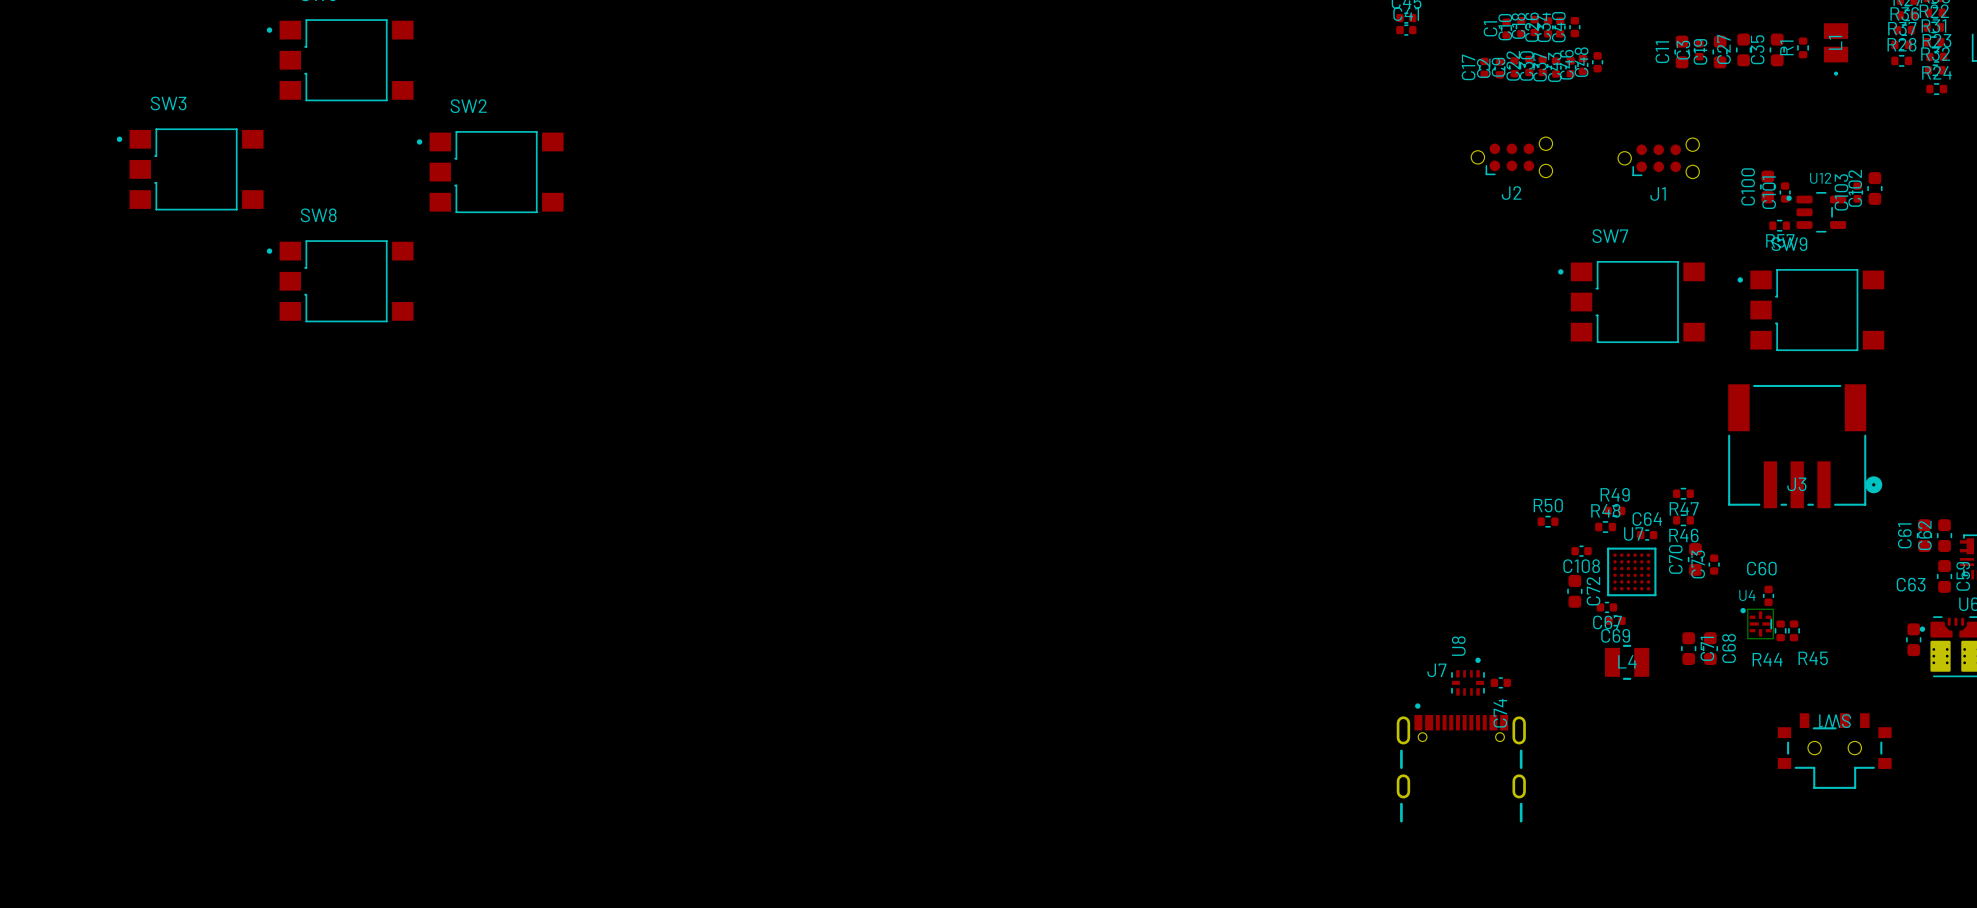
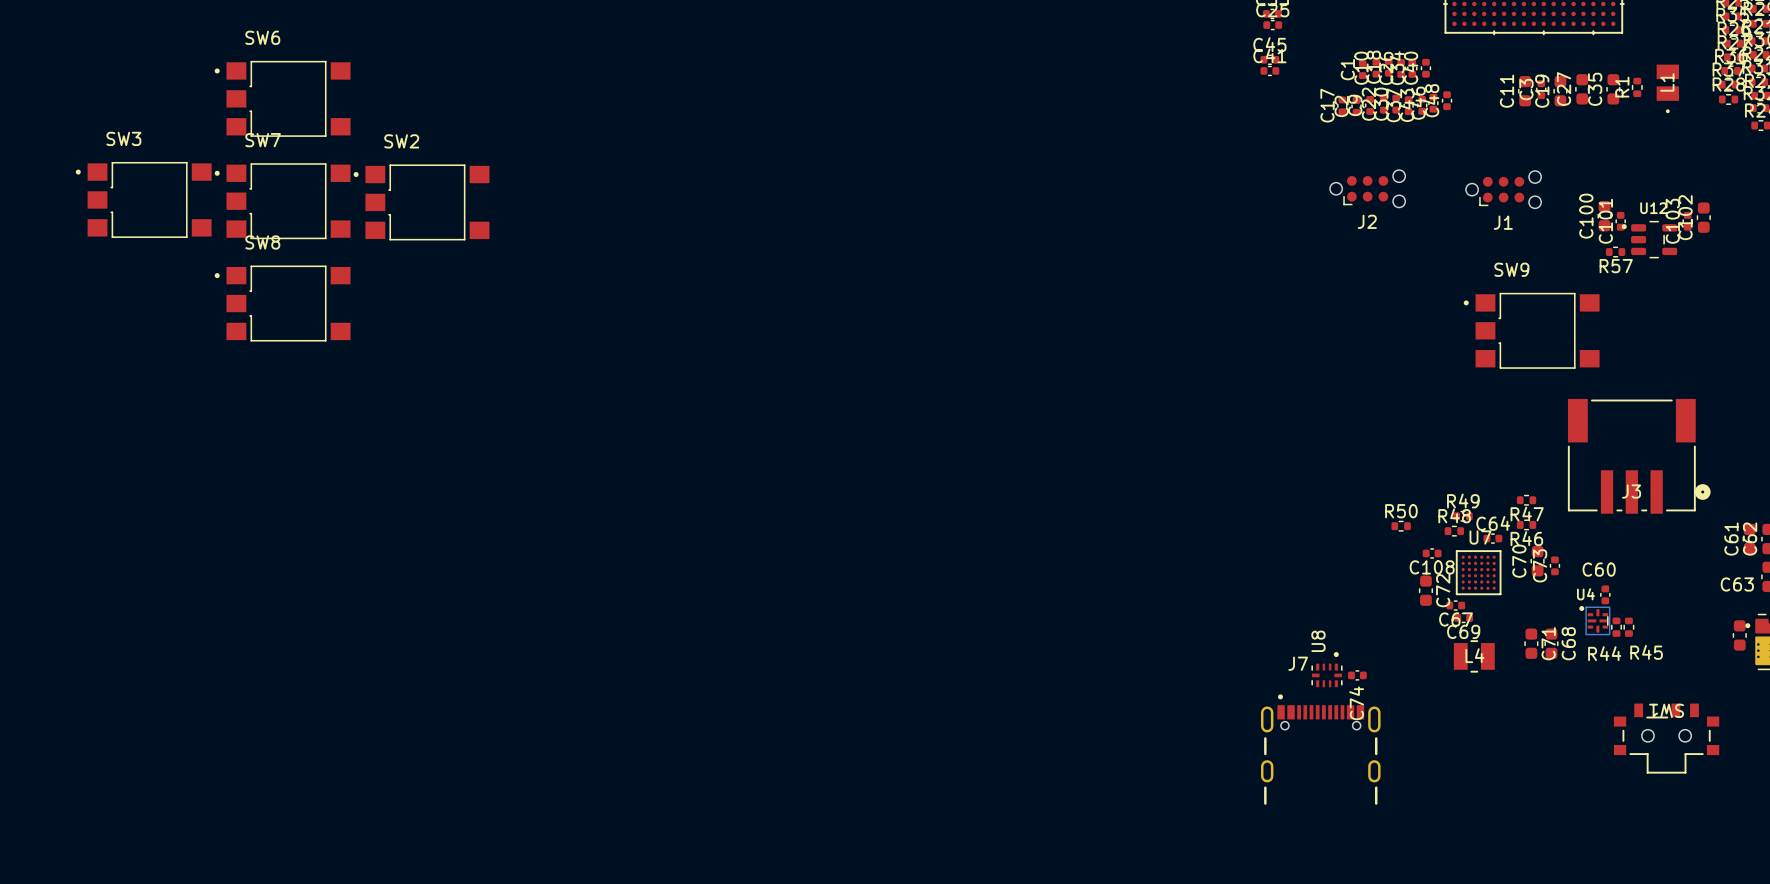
SW7 position: (1631, 302) -> (282, 201)
SW9 position: (1810, 310) -> (1531, 330)

